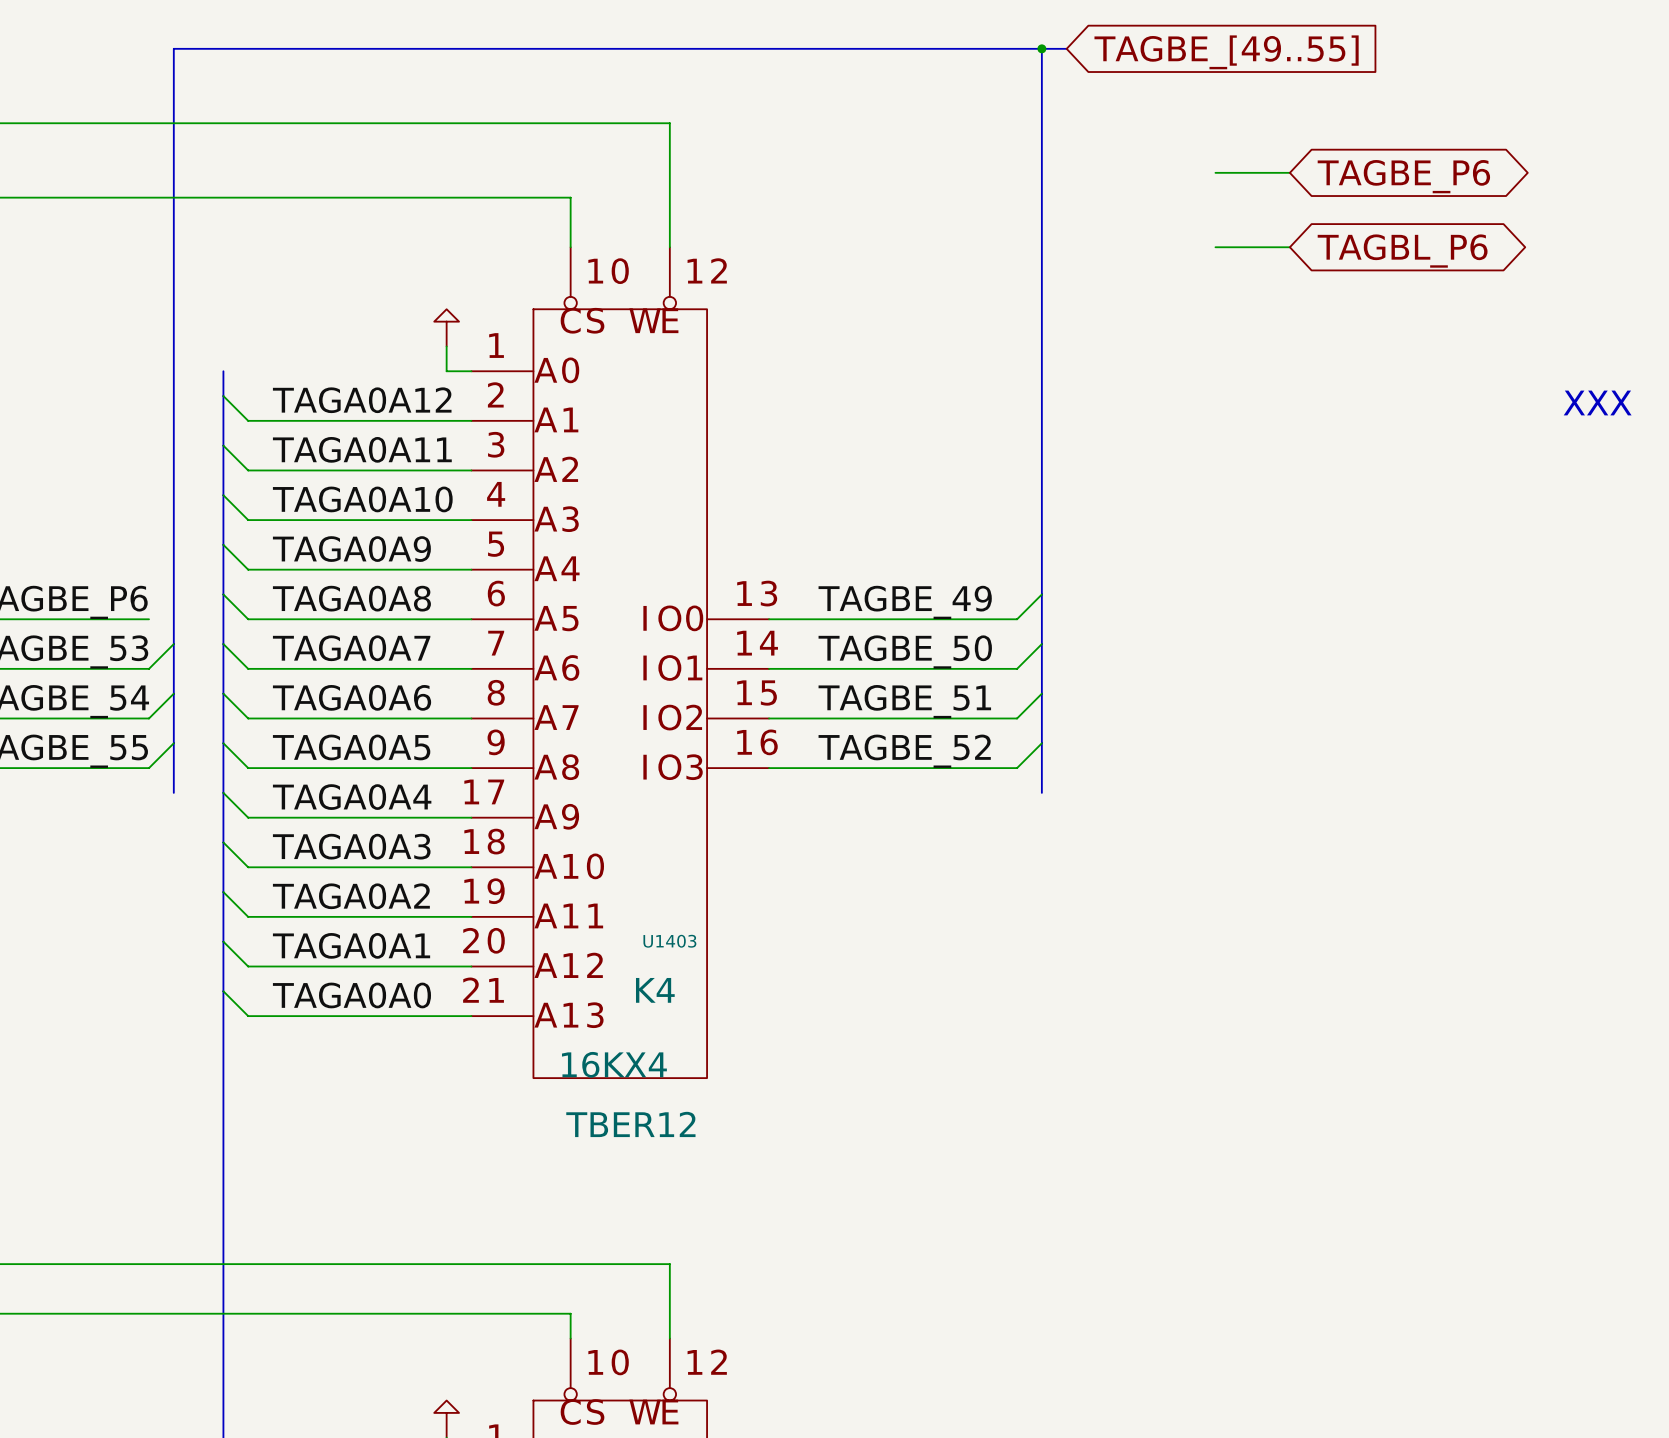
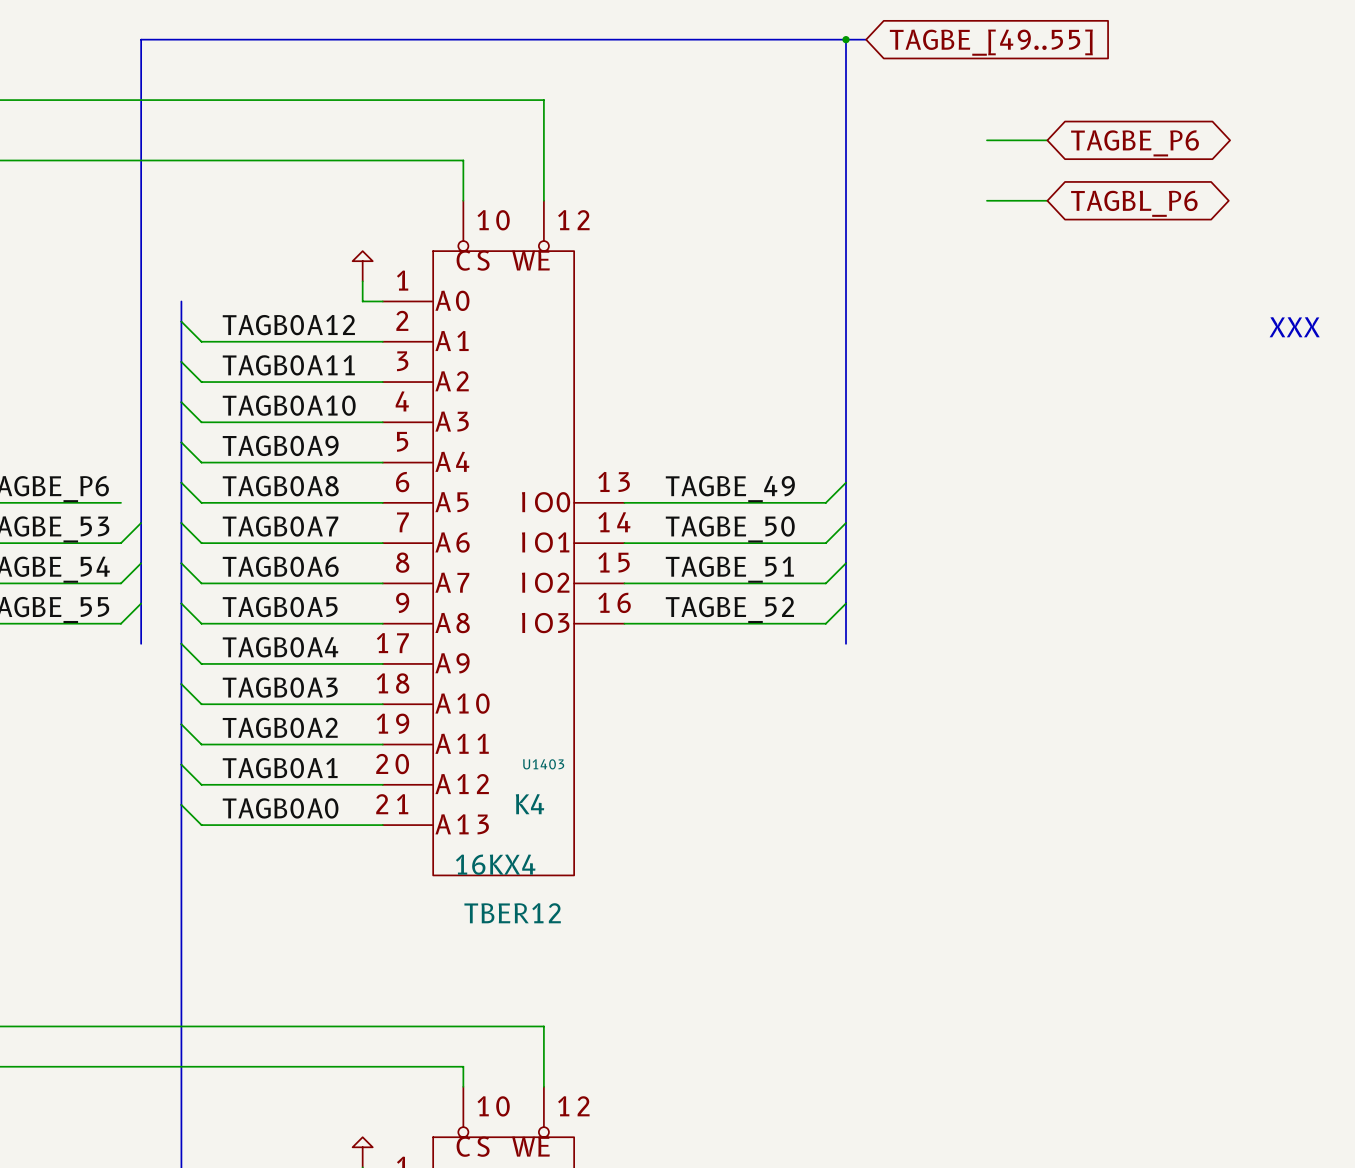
label: TAGA0A12 (362, 400) -> TAGB0A12 (288, 325)
label: TAGA0A11 (362, 449) -> TAGB0A11 (288, 365)
label: TAGA0A10 (362, 499) -> TAGB0A10 (289, 405)
label: TAGA0A9 (351, 549) -> TAGB0A9 (280, 445)
label: TAGA0A8 (351, 598) -> TAGB0A8 (280, 486)
label: TAGA0A7 (351, 648) -> TAGB0A7 (280, 526)
label: TAGA0A6 (352, 697) -> TAGB0A6 (280, 566)
label: TAGA0A5 (351, 747) -> TAGB0A5 (280, 607)
label: TAGA0A4 (352, 797) -> TAGB0A4 (280, 647)
label: TAGA0A3 (351, 846) -> TAGB0A3 (280, 687)
label: TAGA0A2 (351, 896) -> TAGB0A2 (280, 727)
label: TAGA0A1 (351, 945) -> TAGB0A1 (280, 768)
label: TAGA0A0 (351, 995) -> TAGB0A0 (280, 808)

